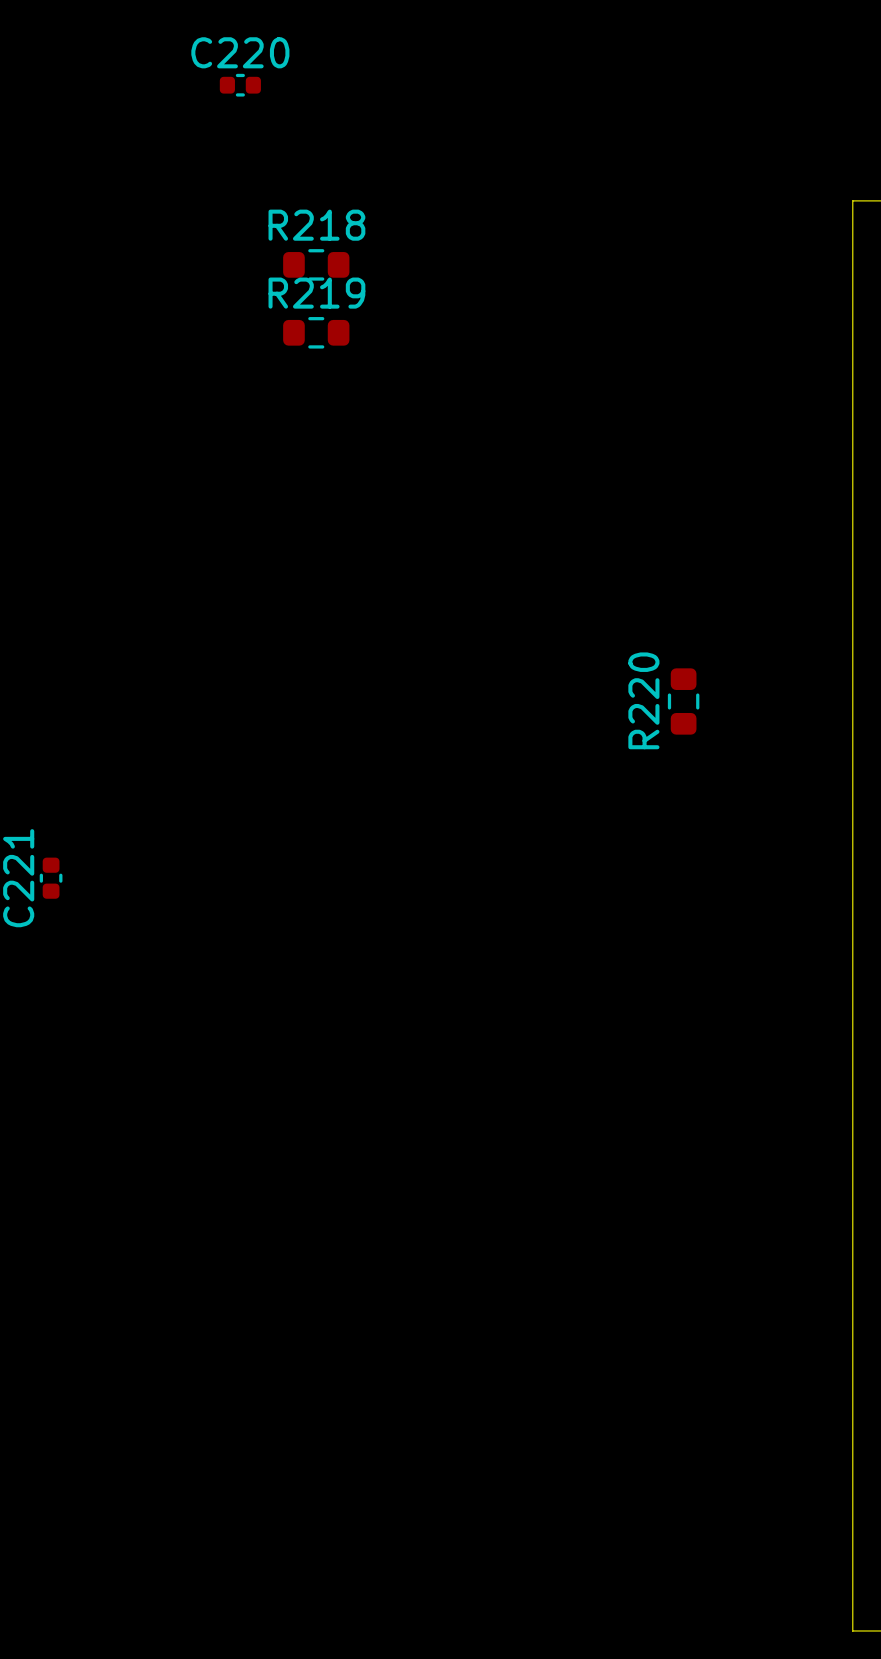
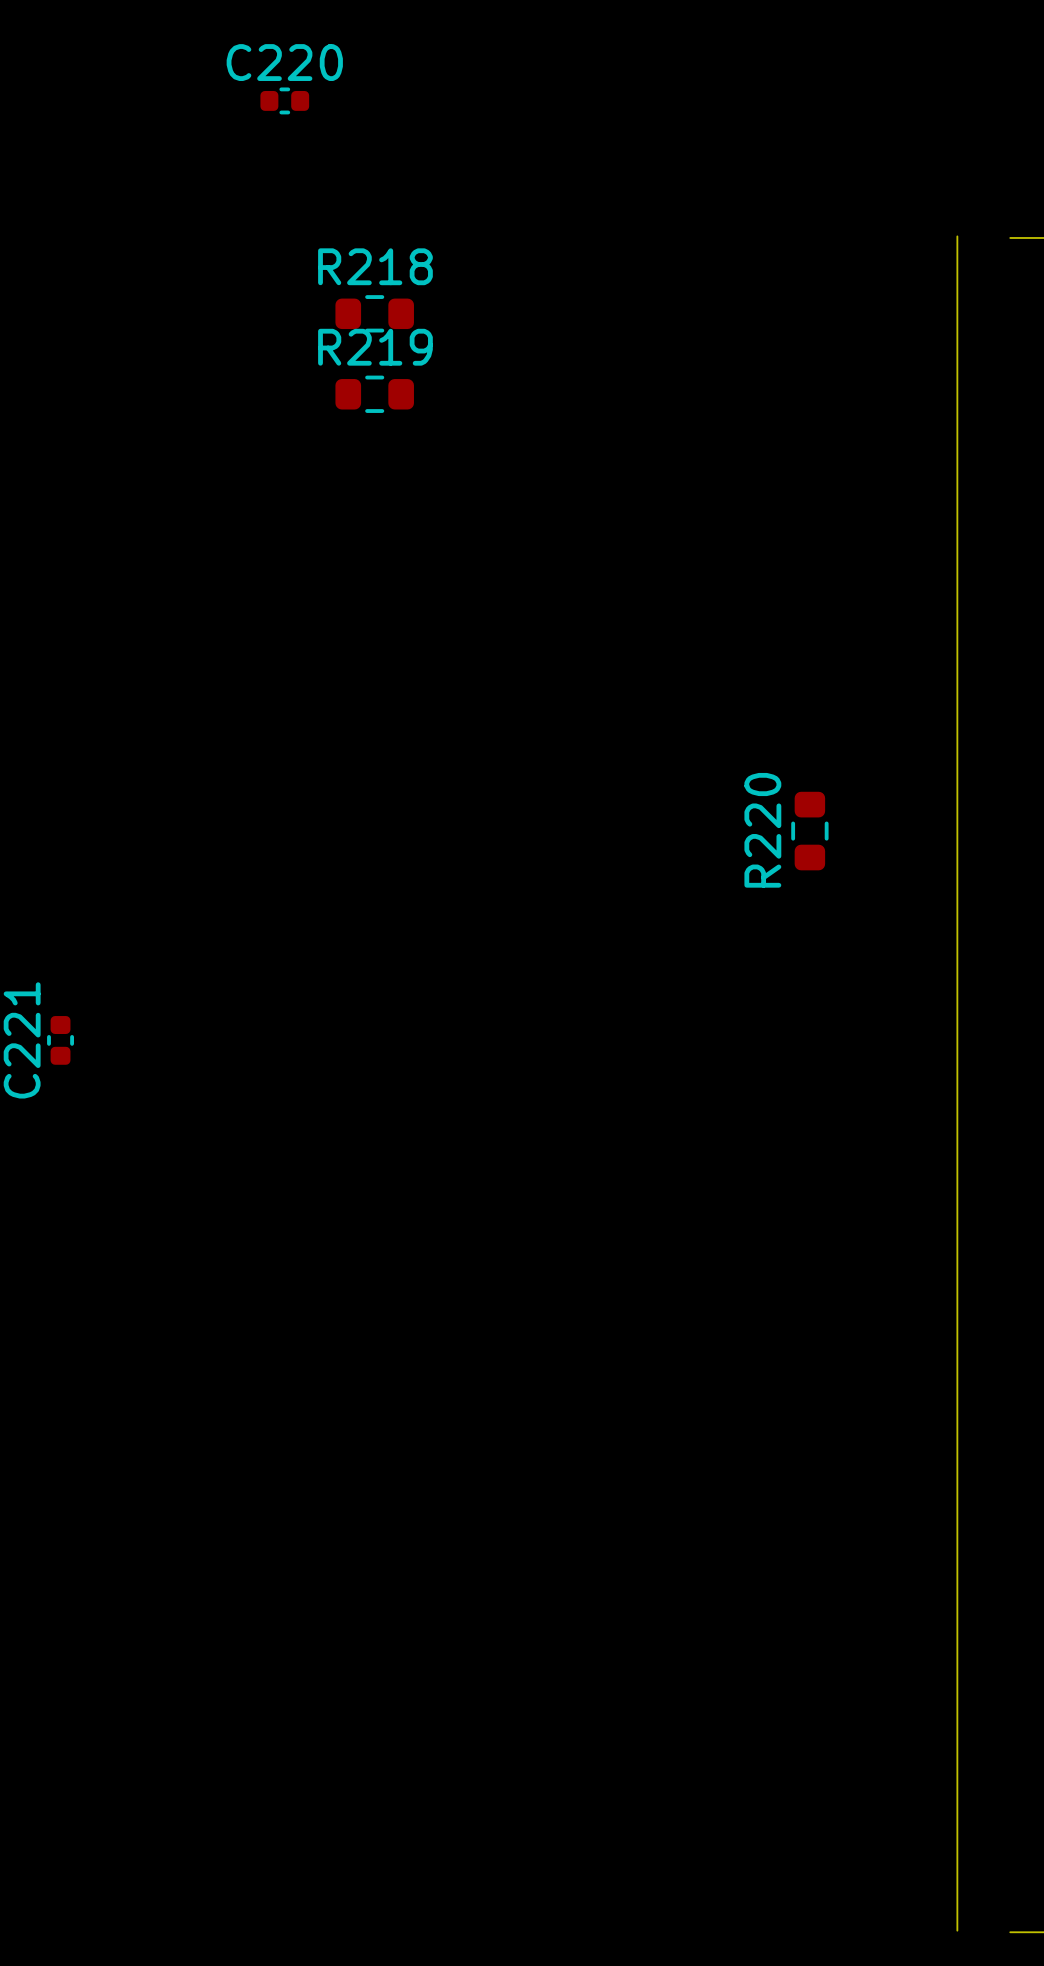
board edge: (852, 200) (852, 1630) -> (957, 236) (957, 1930)

